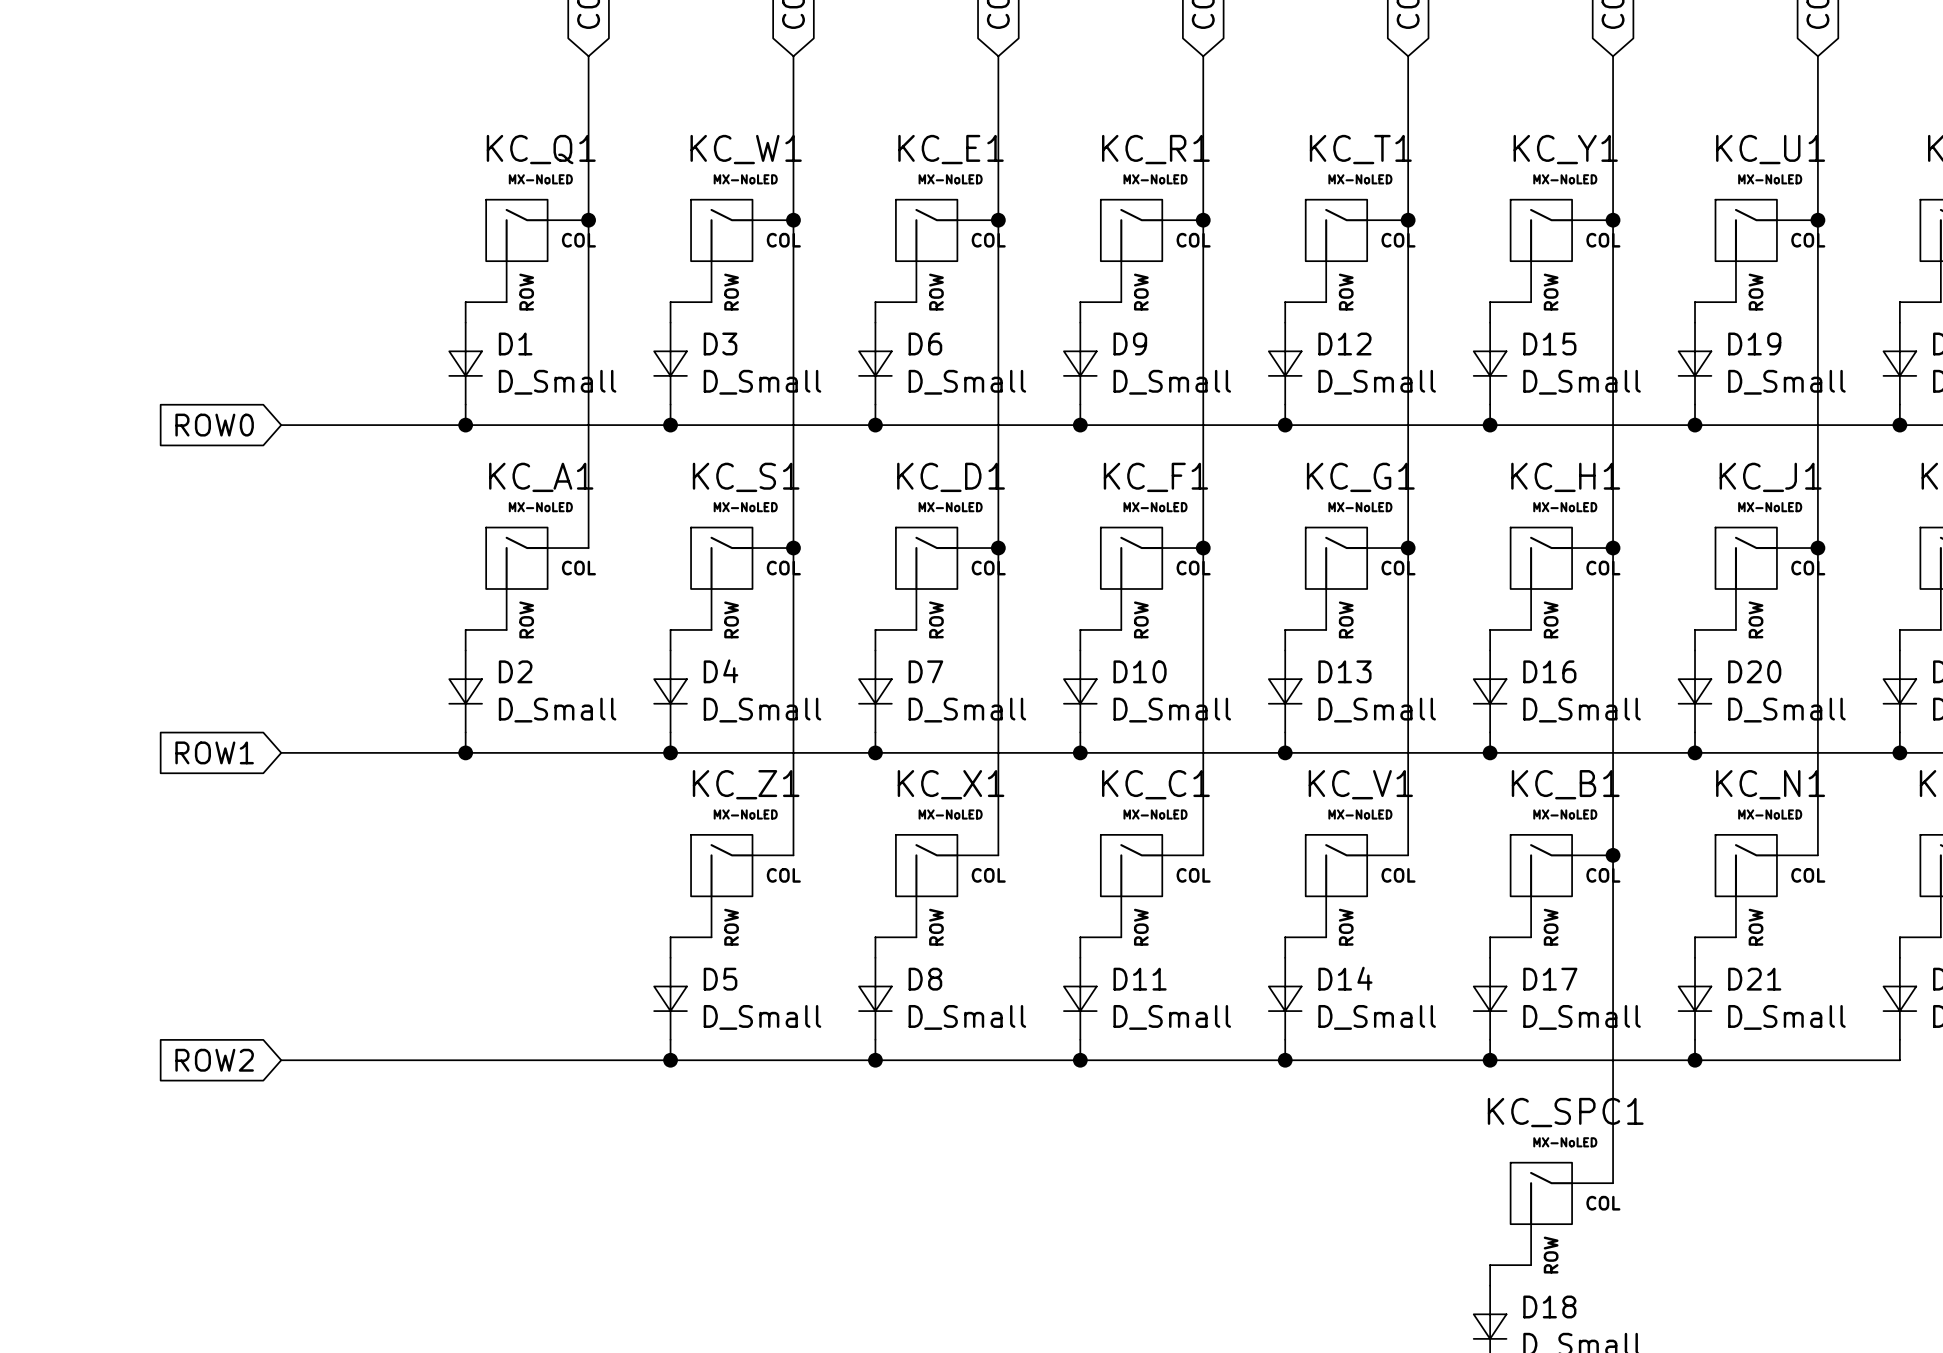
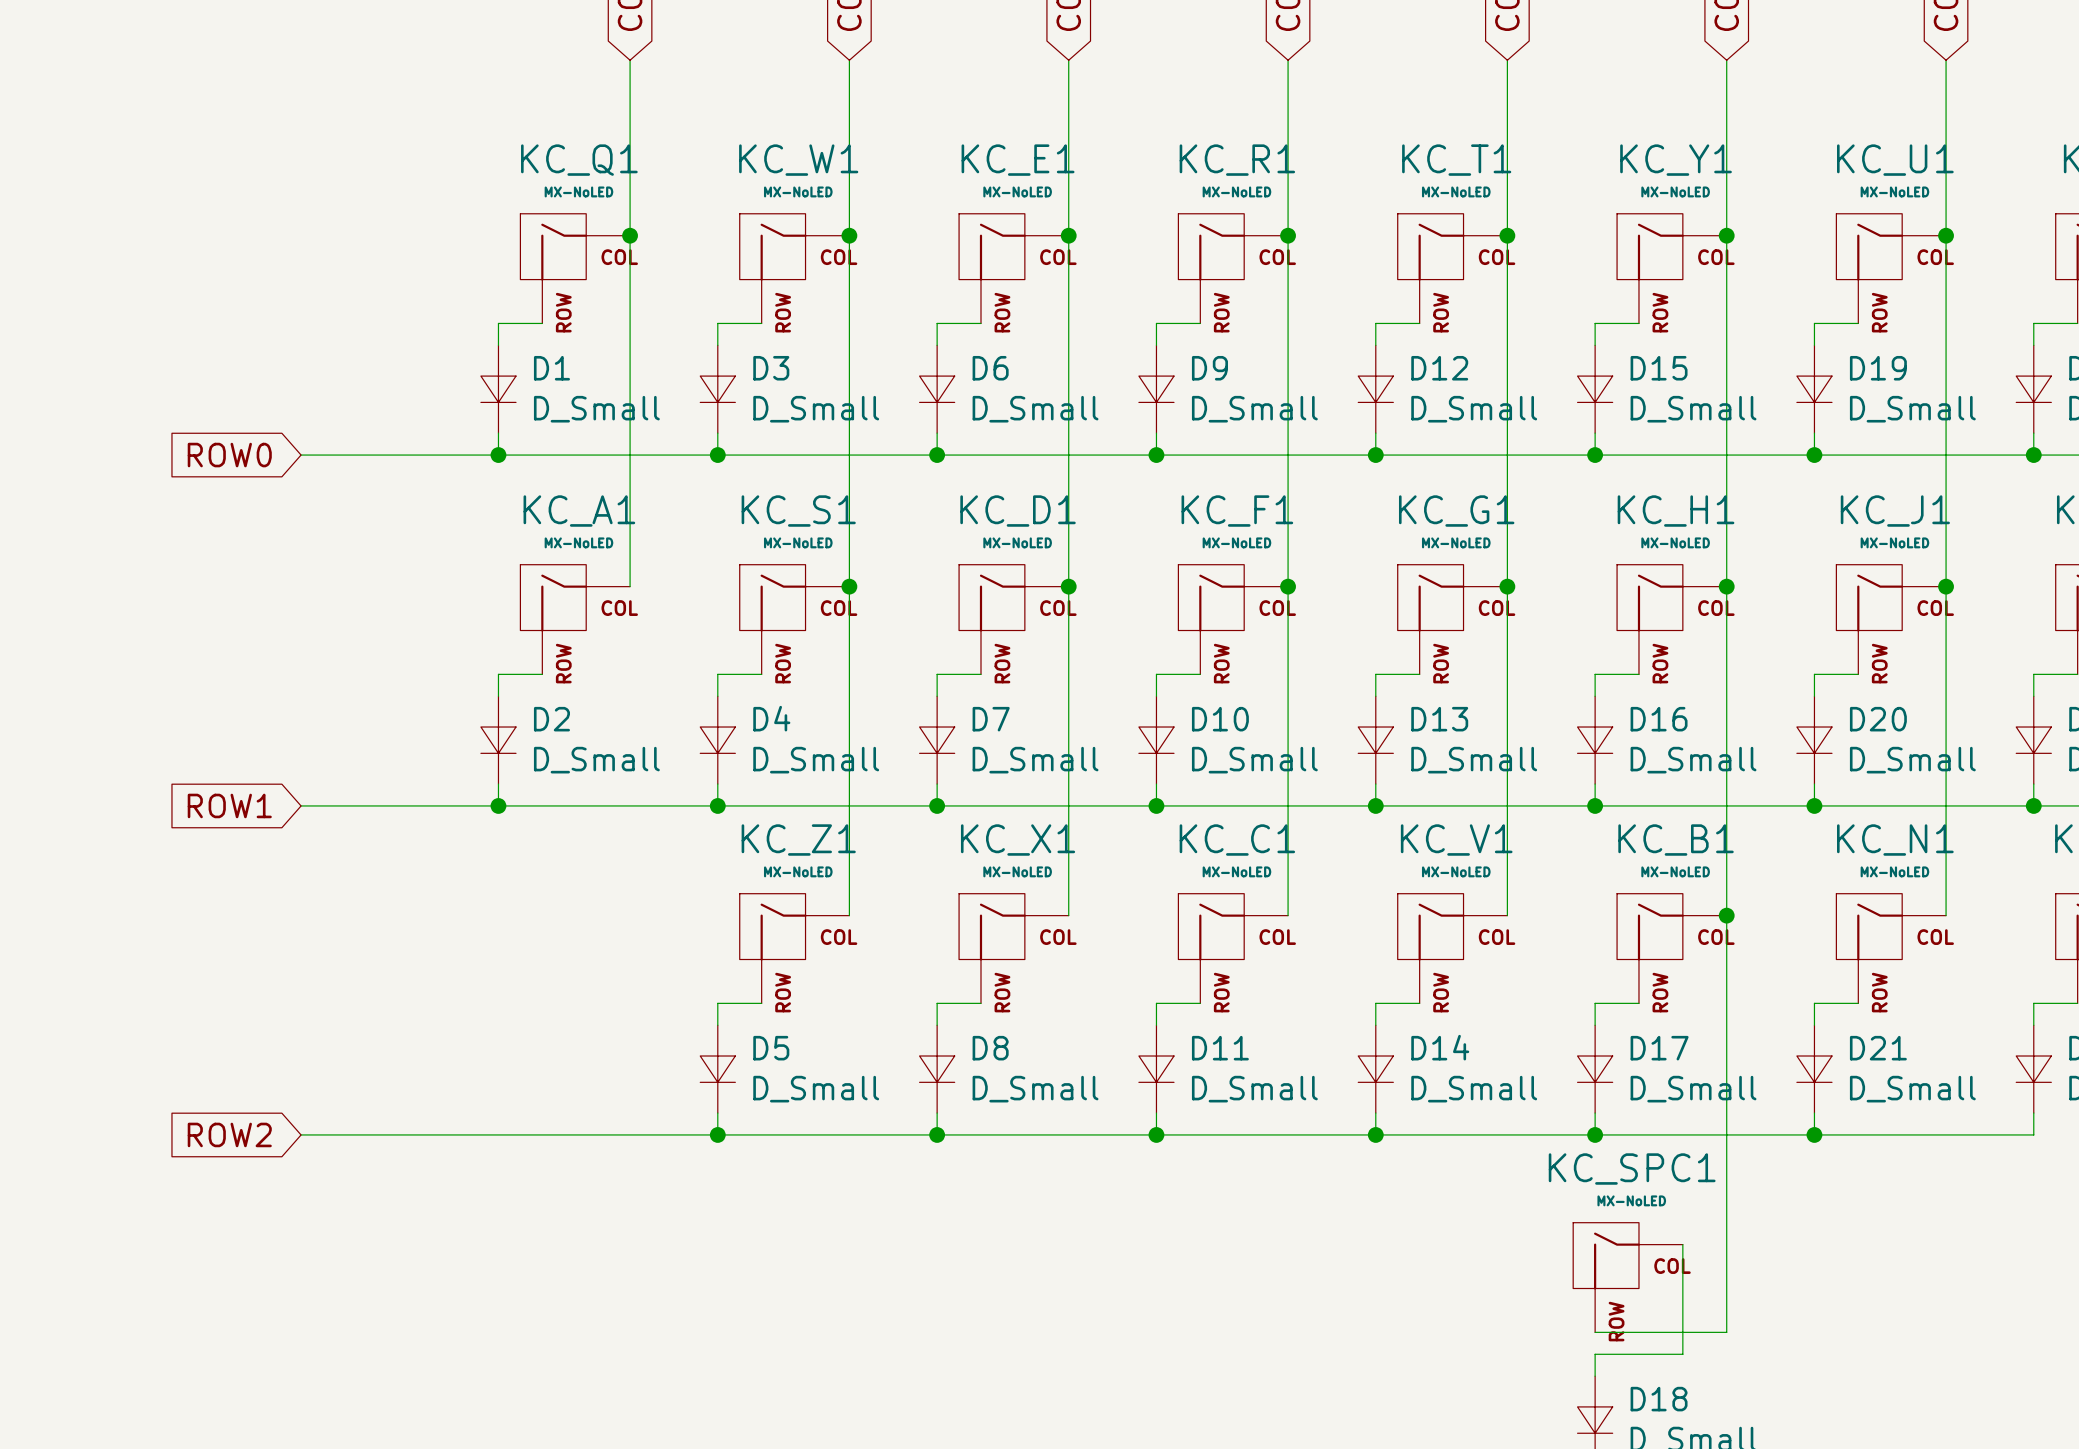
wire: none -> (1682, 1244) (1682, 1354) (1638, 1354)
wire: none -> (1726, 1266) (1726, 1332) (1595, 1332)
KC_SPC1 position: (1561, 1213) -> (1628, 1277)

